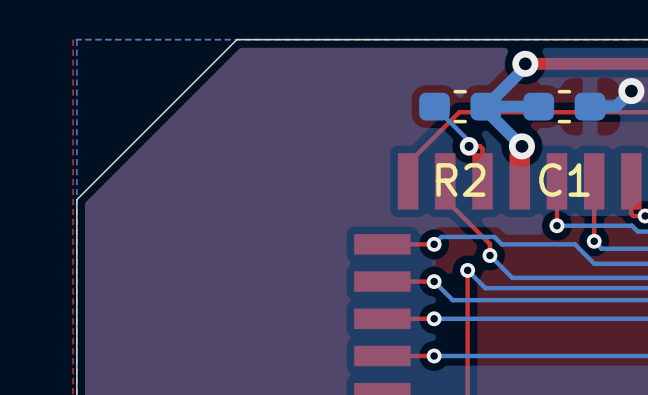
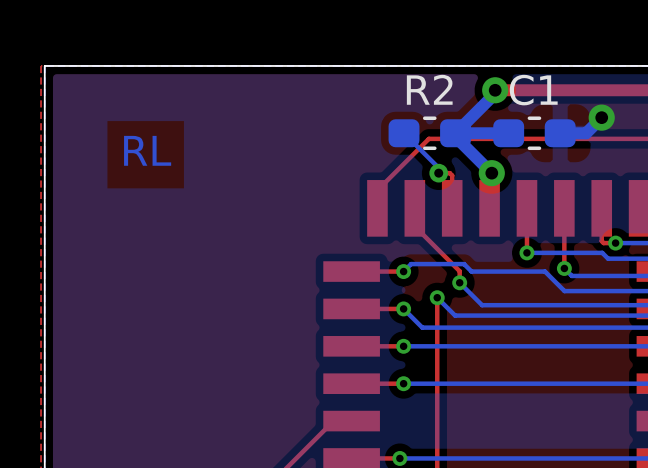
board edge: (236, 39) (76, 199) -> (205, 65) (44, 65) (44, 226)
text: none -> RL (147, 150)
R2 name position: R2 (460, 179) -> R2 (429, 89)
C1 name position: C1 (564, 179) -> C1 (533, 90)

